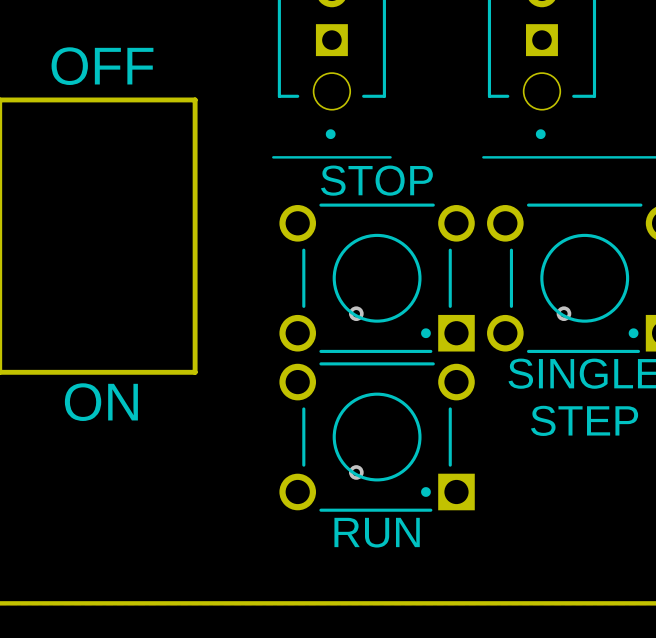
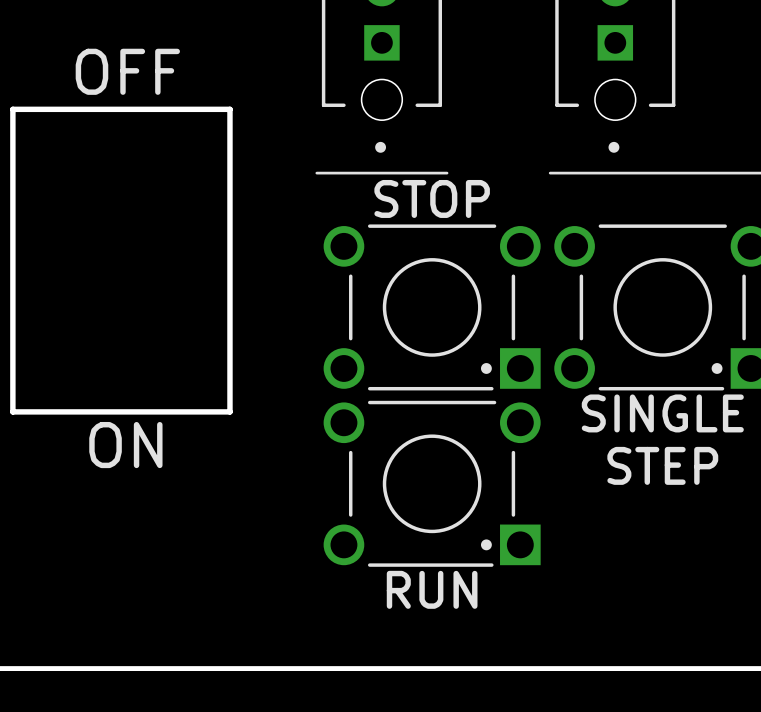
via: (356, 313) -> none
via: (563, 313) -> none
via: (356, 472) -> none

